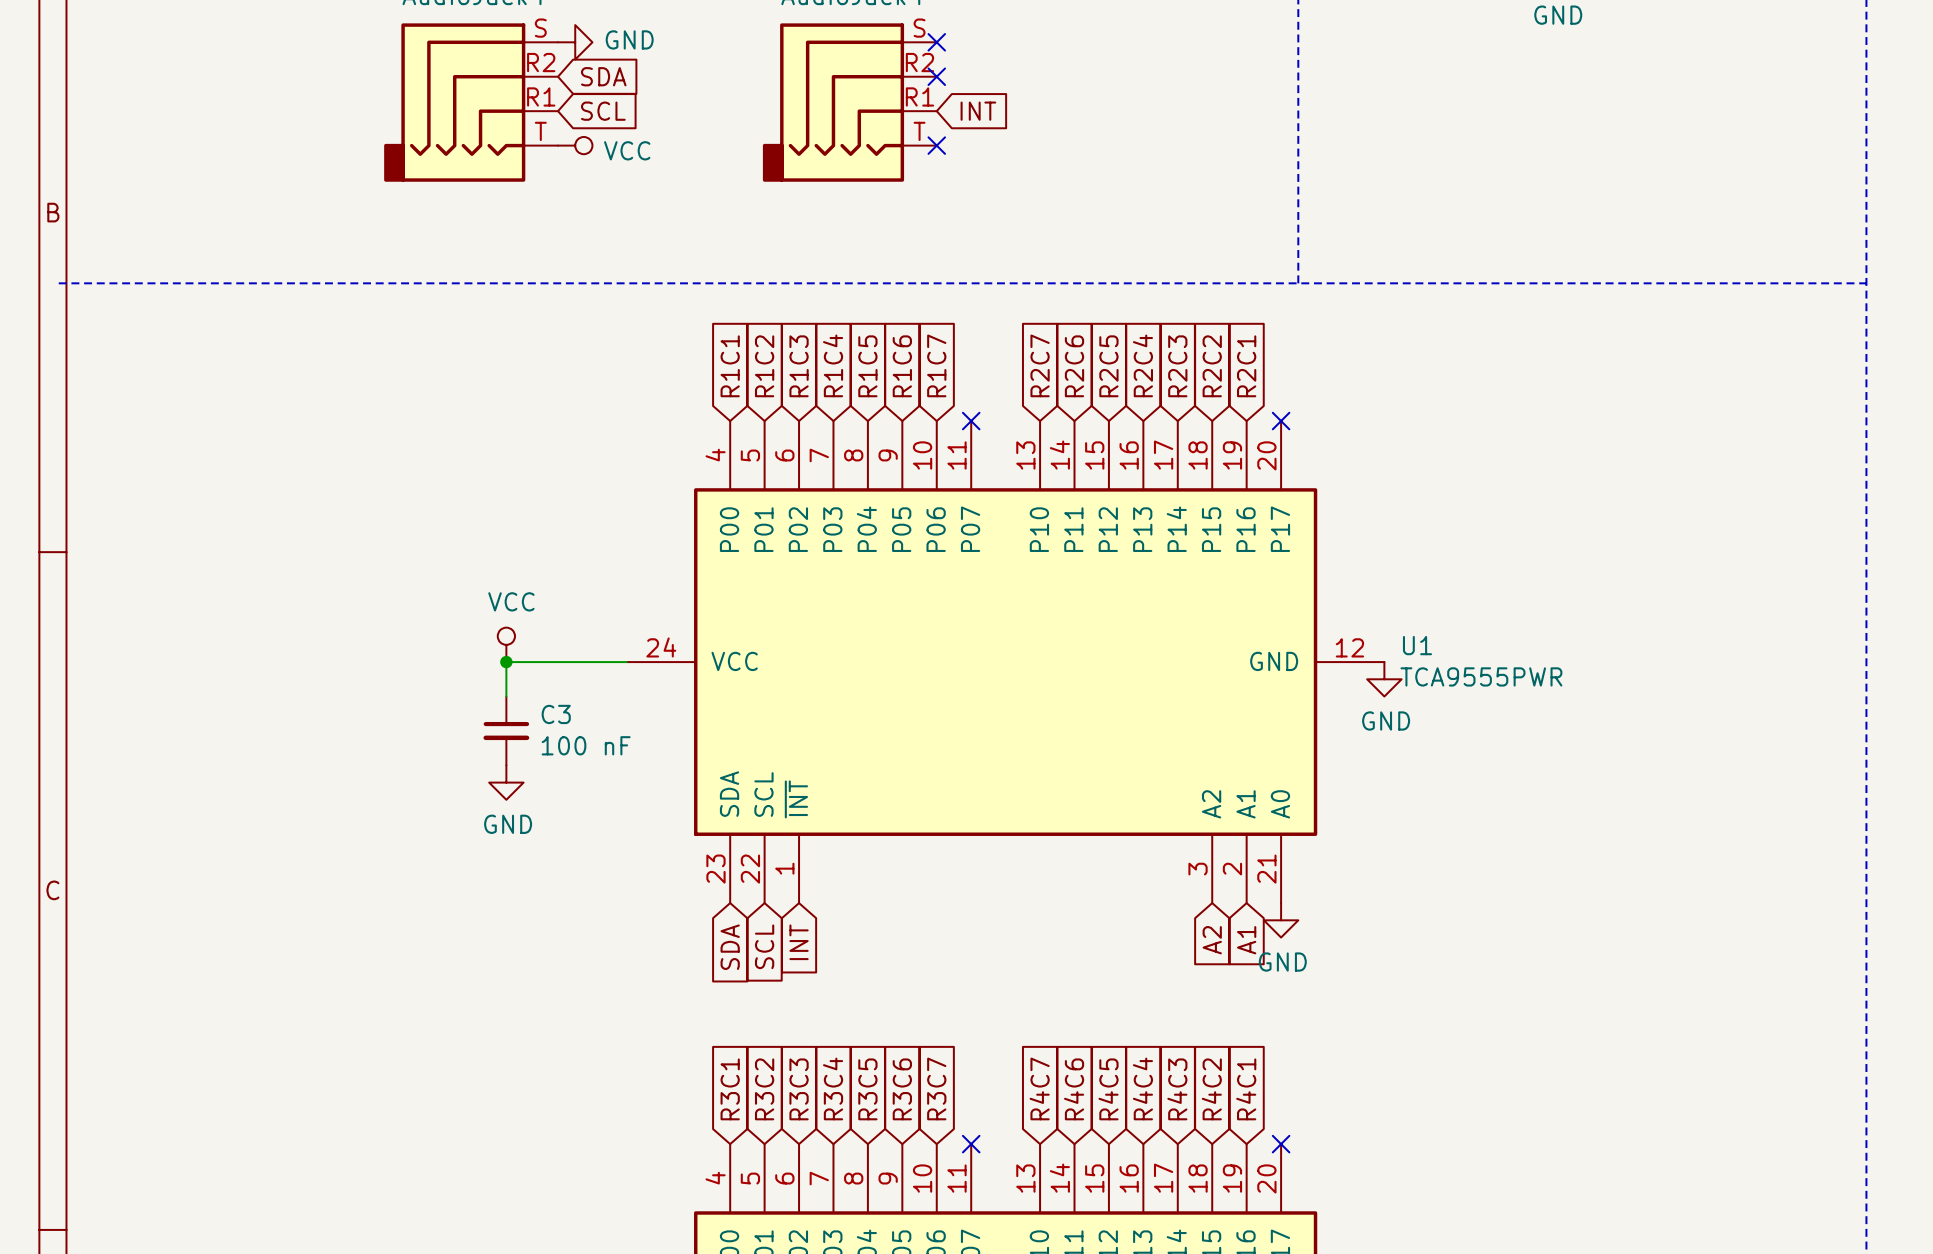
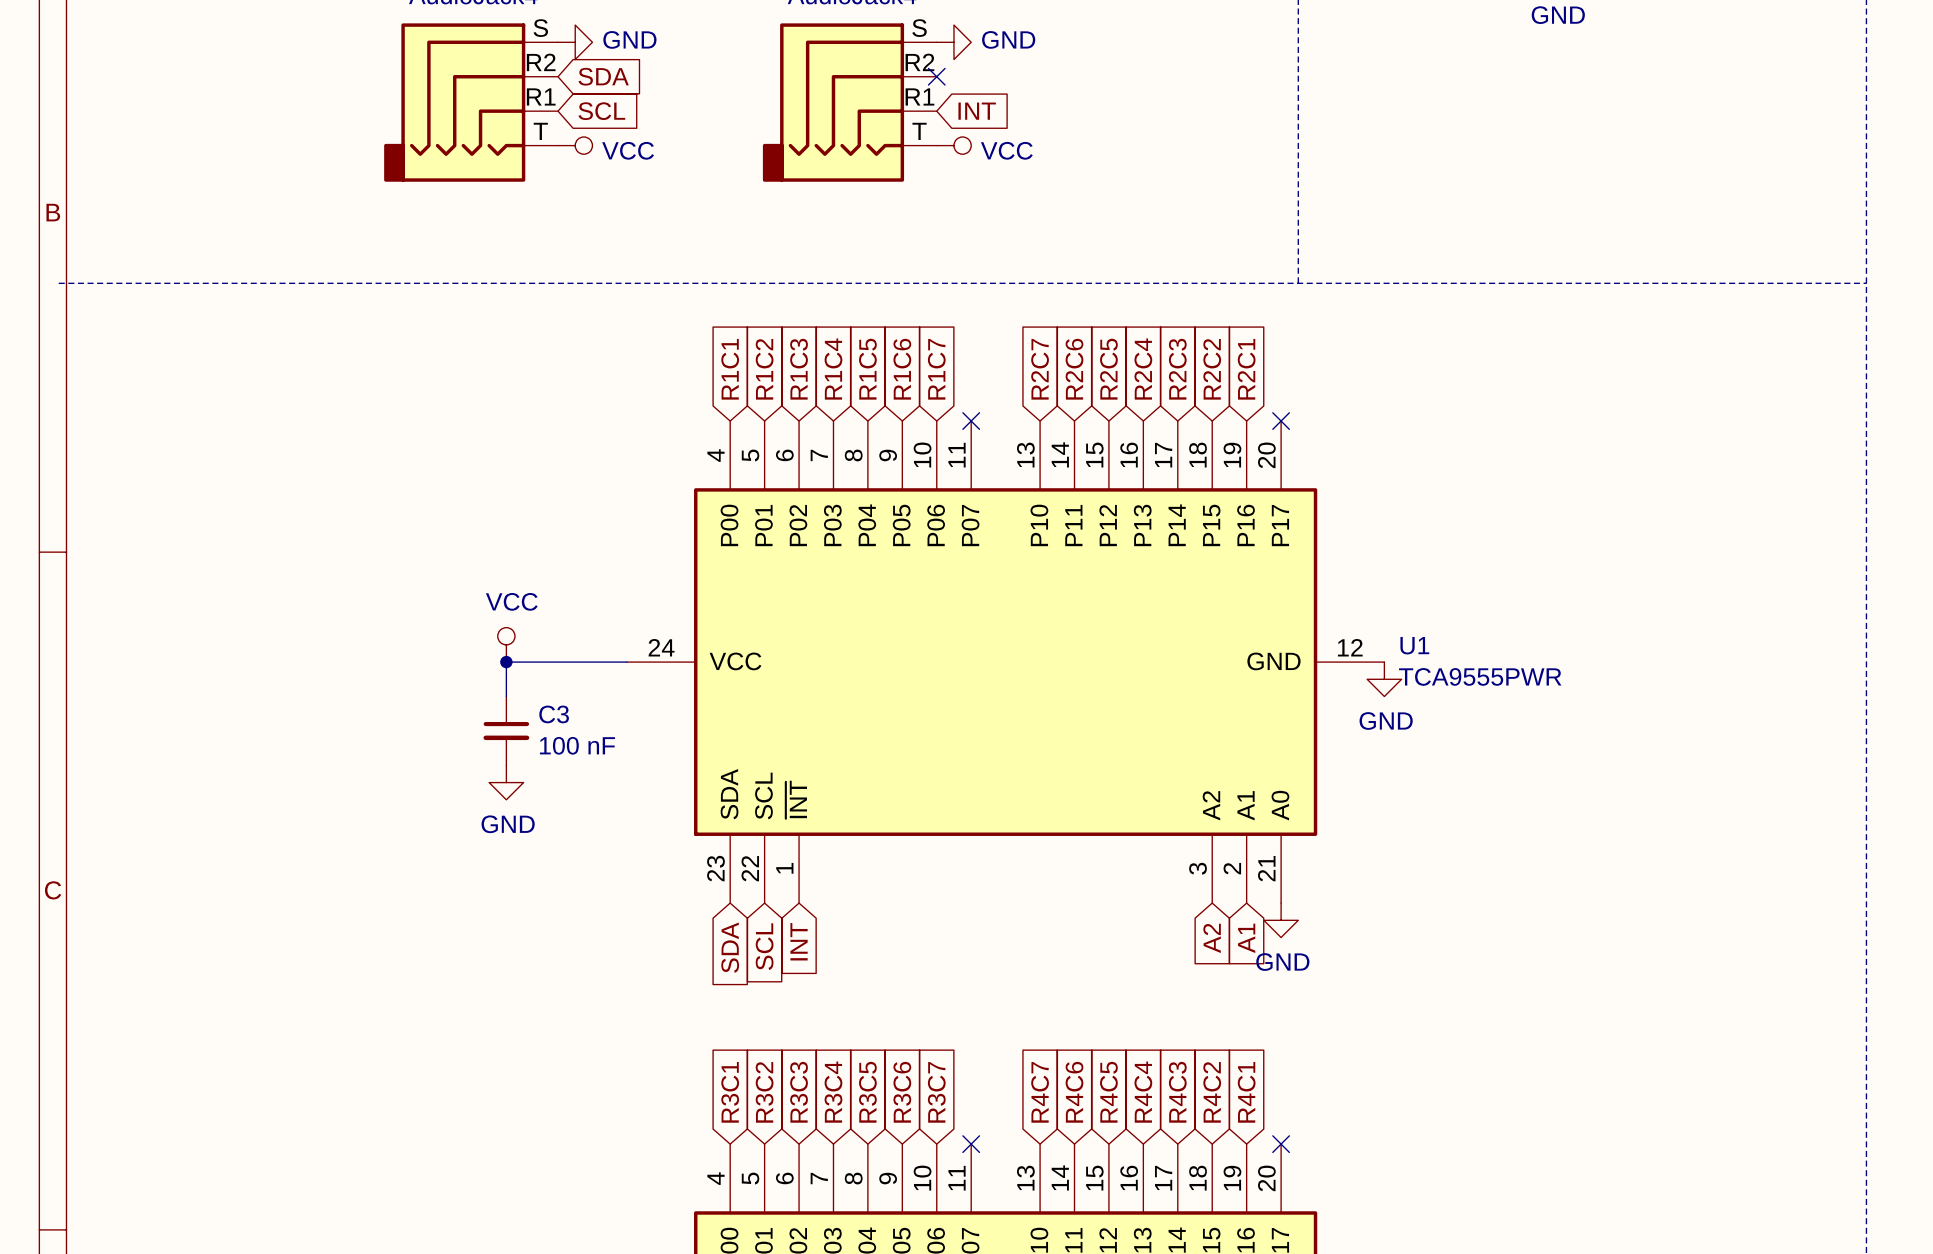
no-connect mark: (936, 42) -> none
power symbol: none -> GND (953, 42)
no-connect mark: (936, 145) -> none
power symbol: none -> VCC (953, 145)

